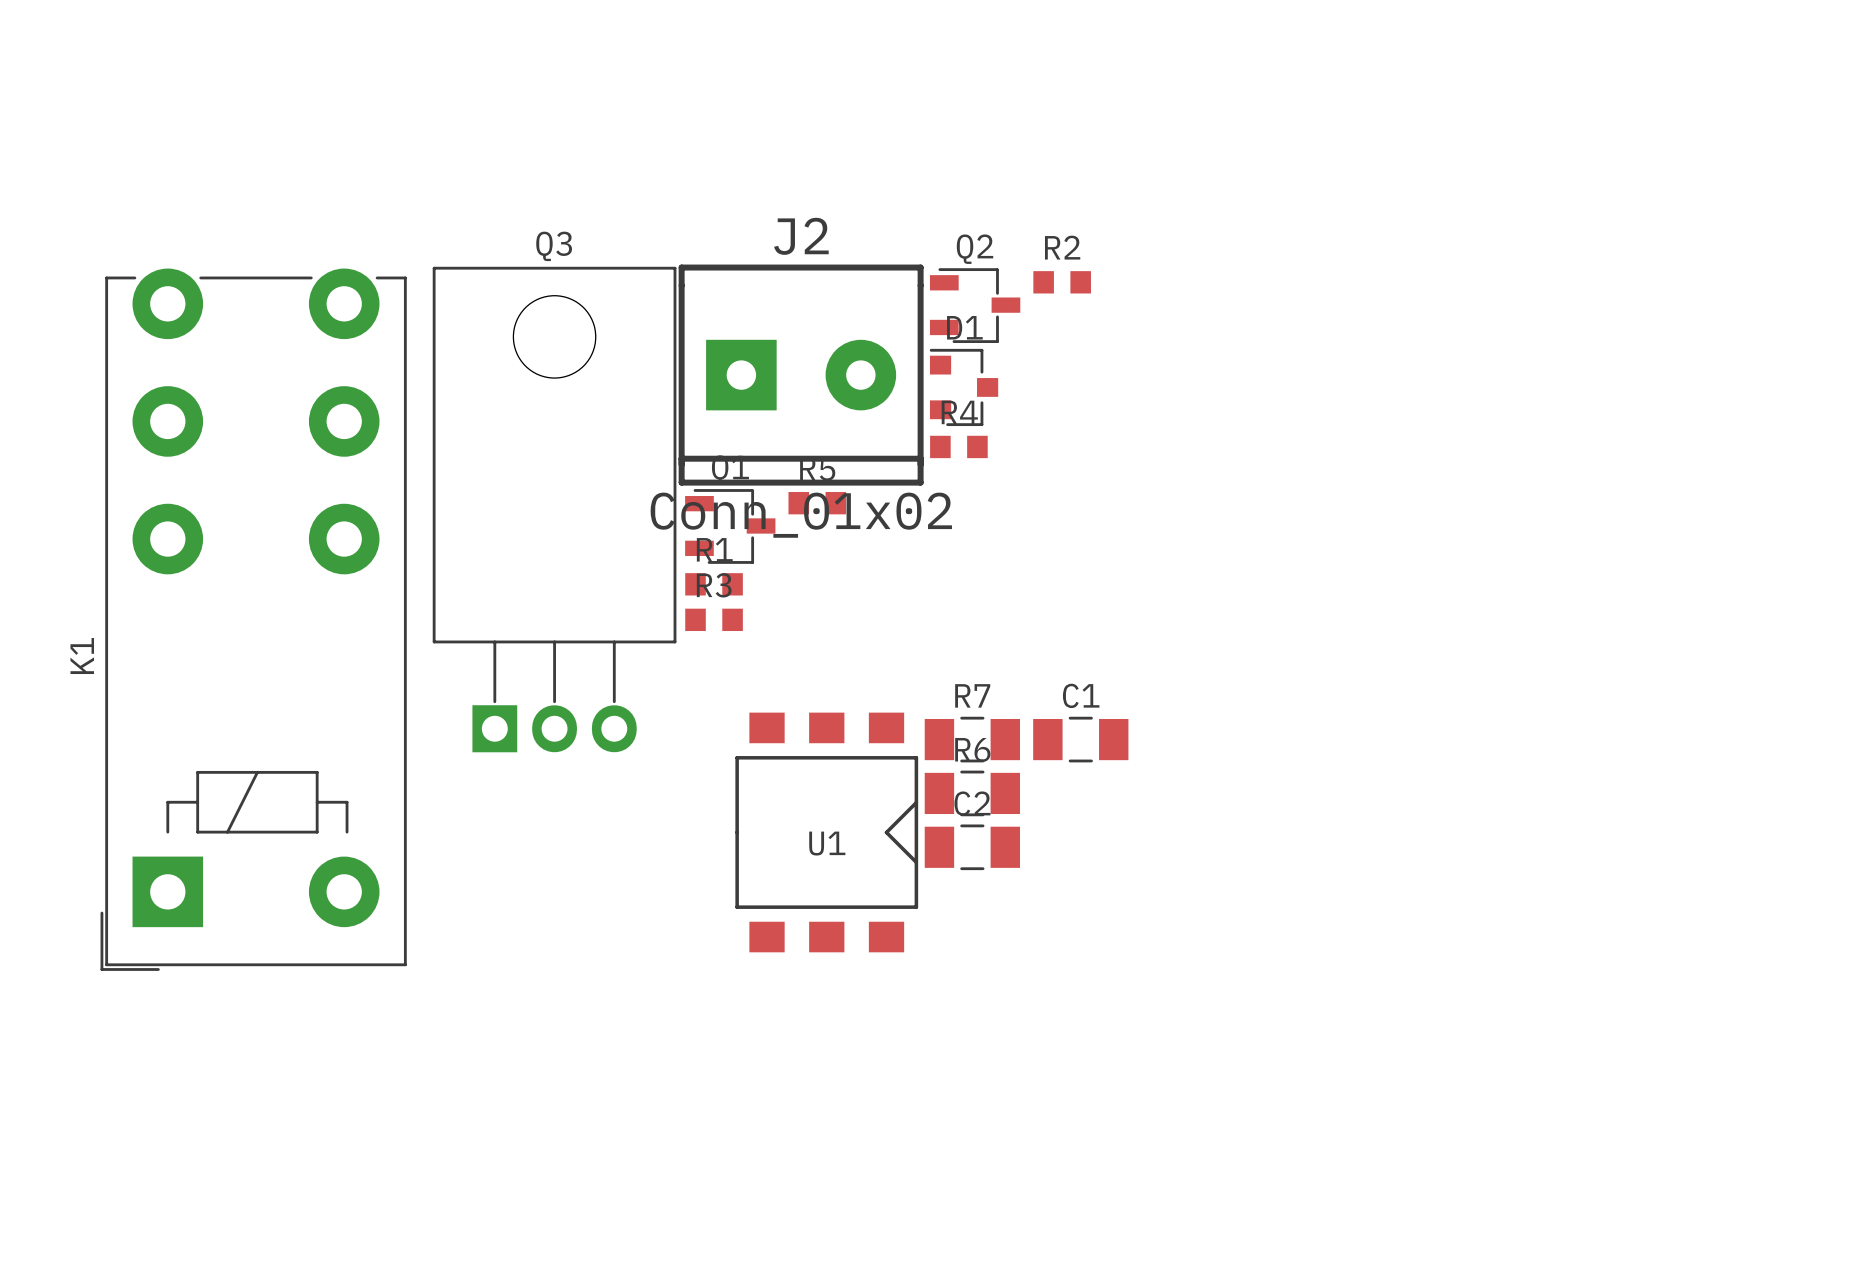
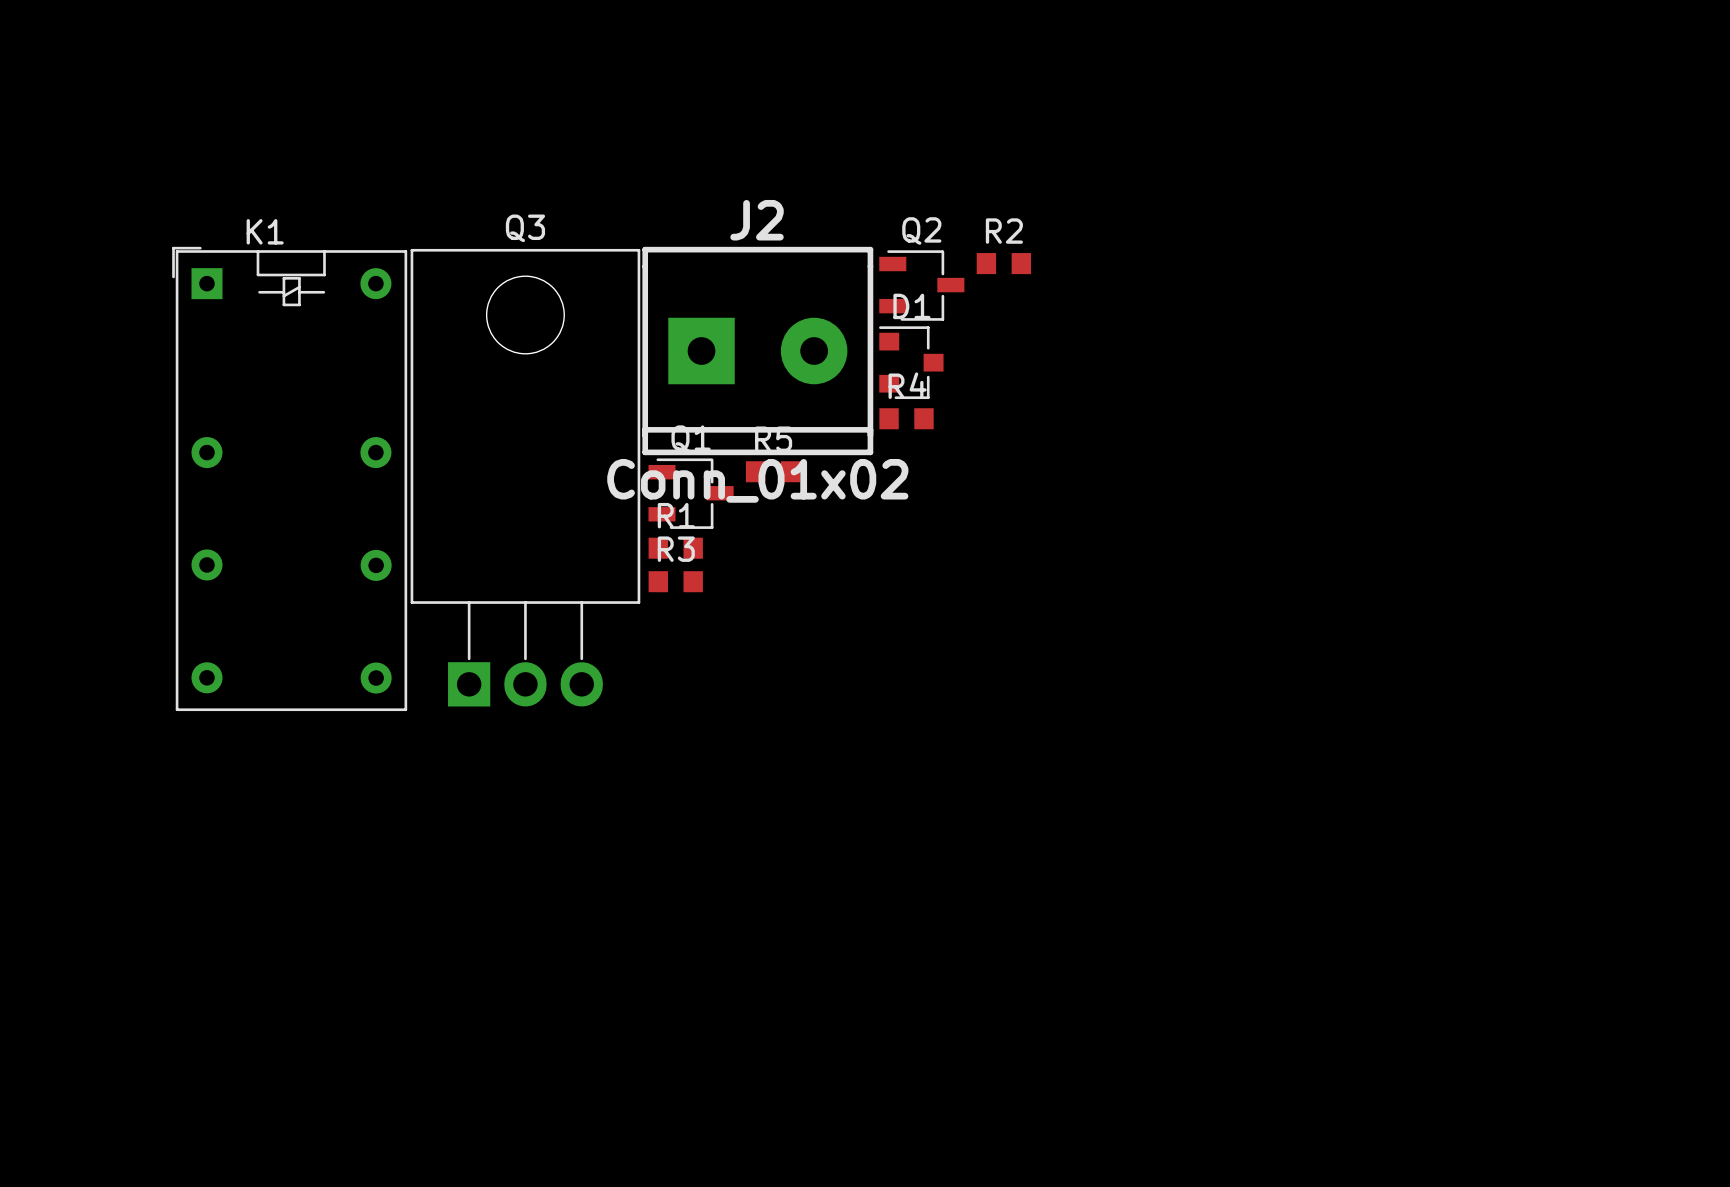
K1 footprint: [100, 268, 407, 971] -> [172, 246, 408, 712]
K1 name position: K1 (82, 656) -> K1 (265, 231)
R7: (972, 739) -> none
C1: (1080, 739) -> none
R6: (972, 793) -> none
U1: (826, 832) -> none
C2: (972, 847) -> none

